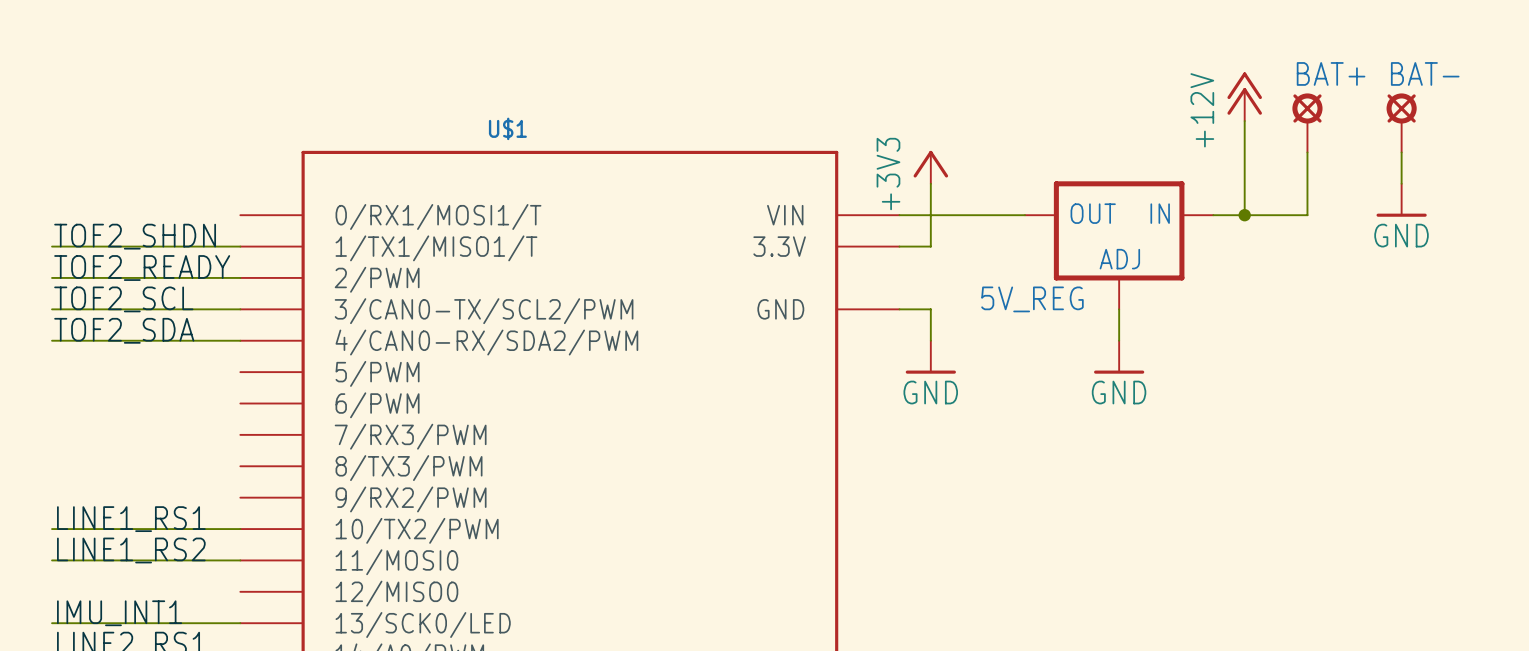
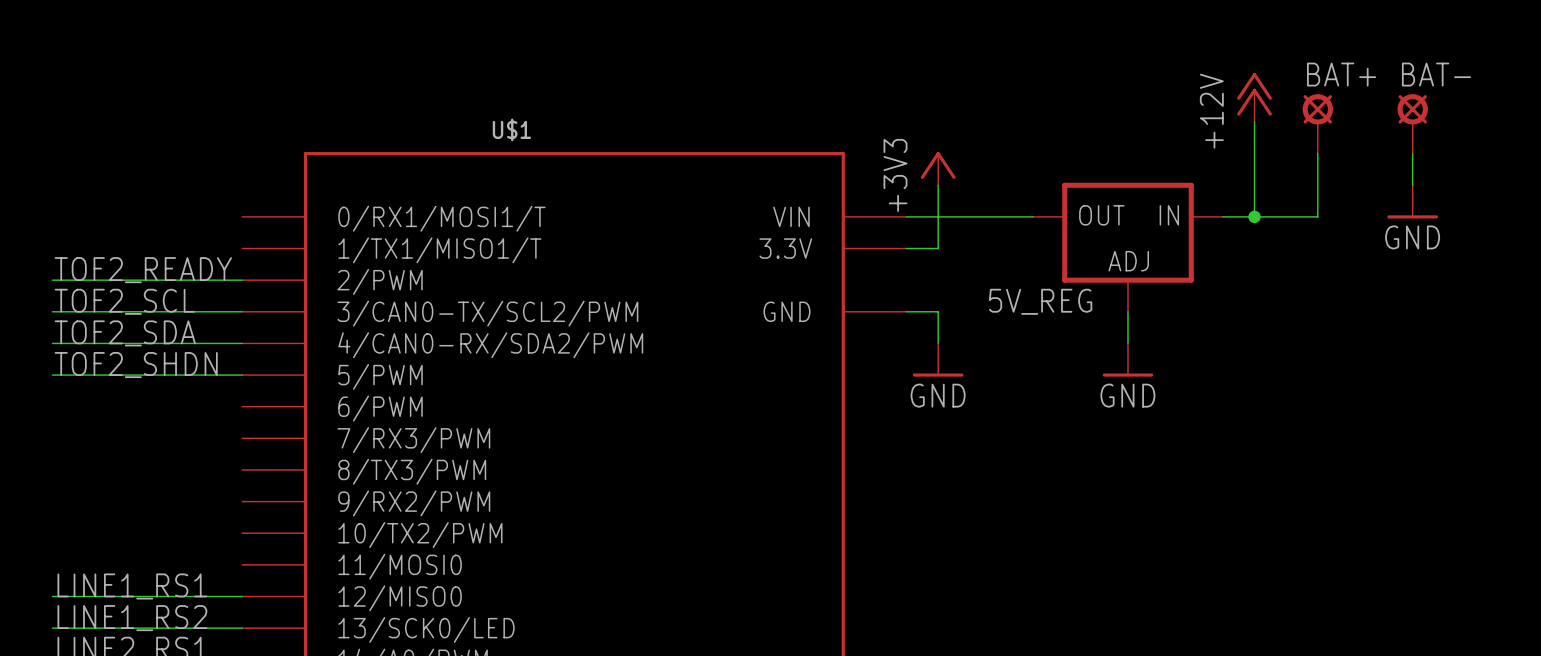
label position: TOF2_SHDN (135, 236) -> TOF2_SHDN (136, 365)
wire: (52, 246) (240, 246) -> (52, 375) (242, 375)
label position: LINE1_RS1 (131, 519) -> LINE1_RS1 (132, 586)
wire: (52, 529) (240, 529) -> none
label: LINE1_RS2 (131, 550) -> none
wire: (52, 560) (240, 560) -> (52, 596) (242, 596)
label: IMU_INT1 (119, 613) -> LINE1_RS2 (132, 618)

